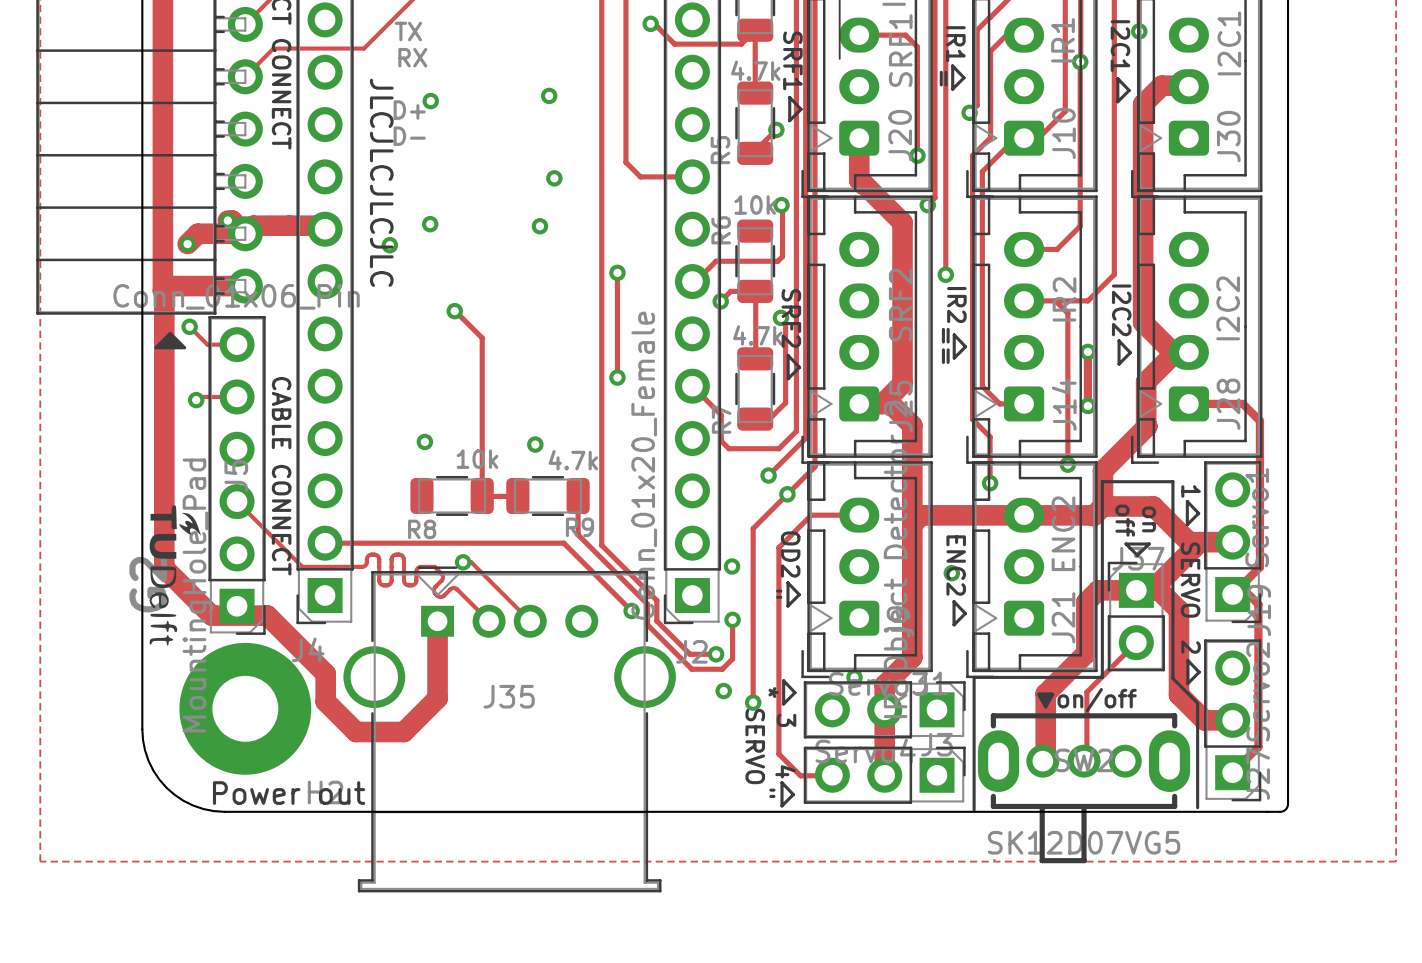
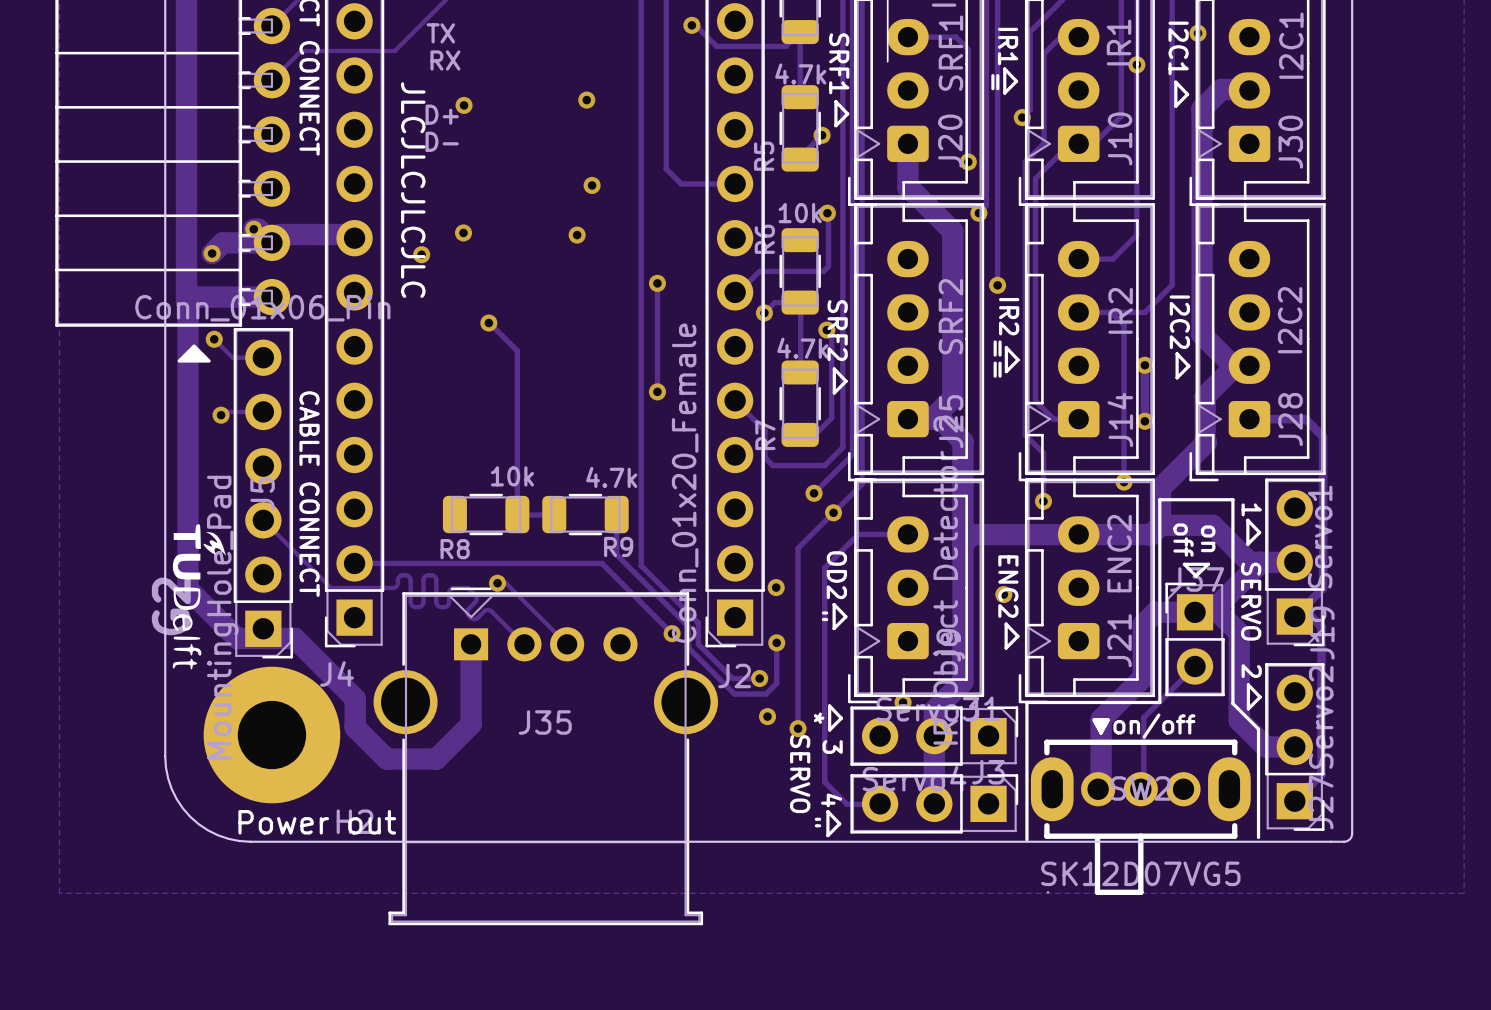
via: (424, 441) -> none
via: (535, 444) -> none

